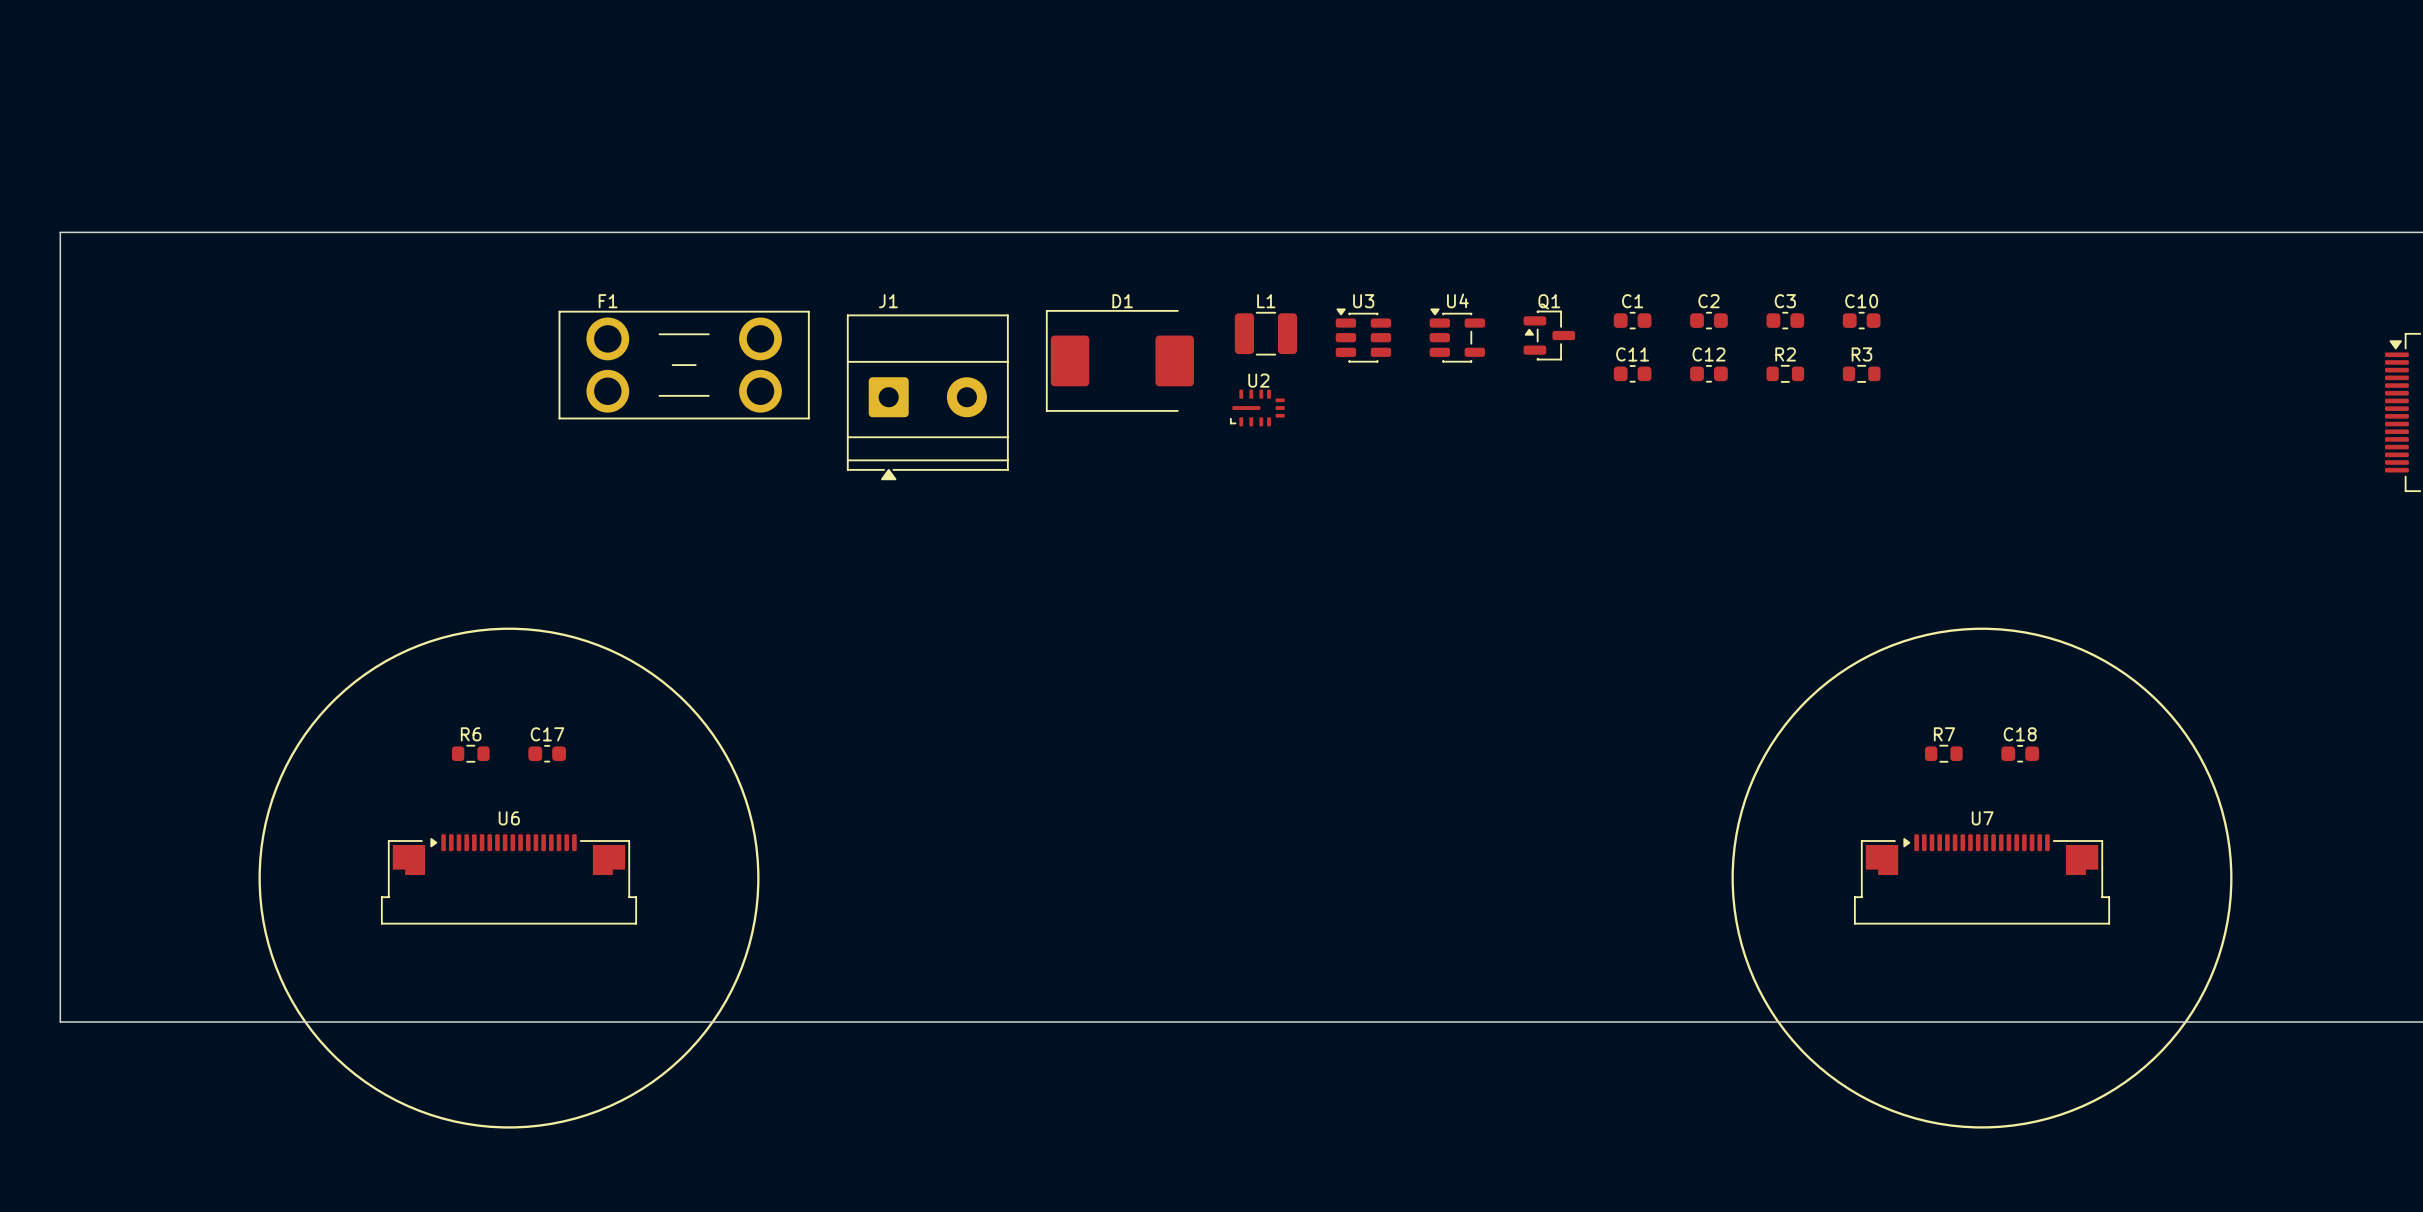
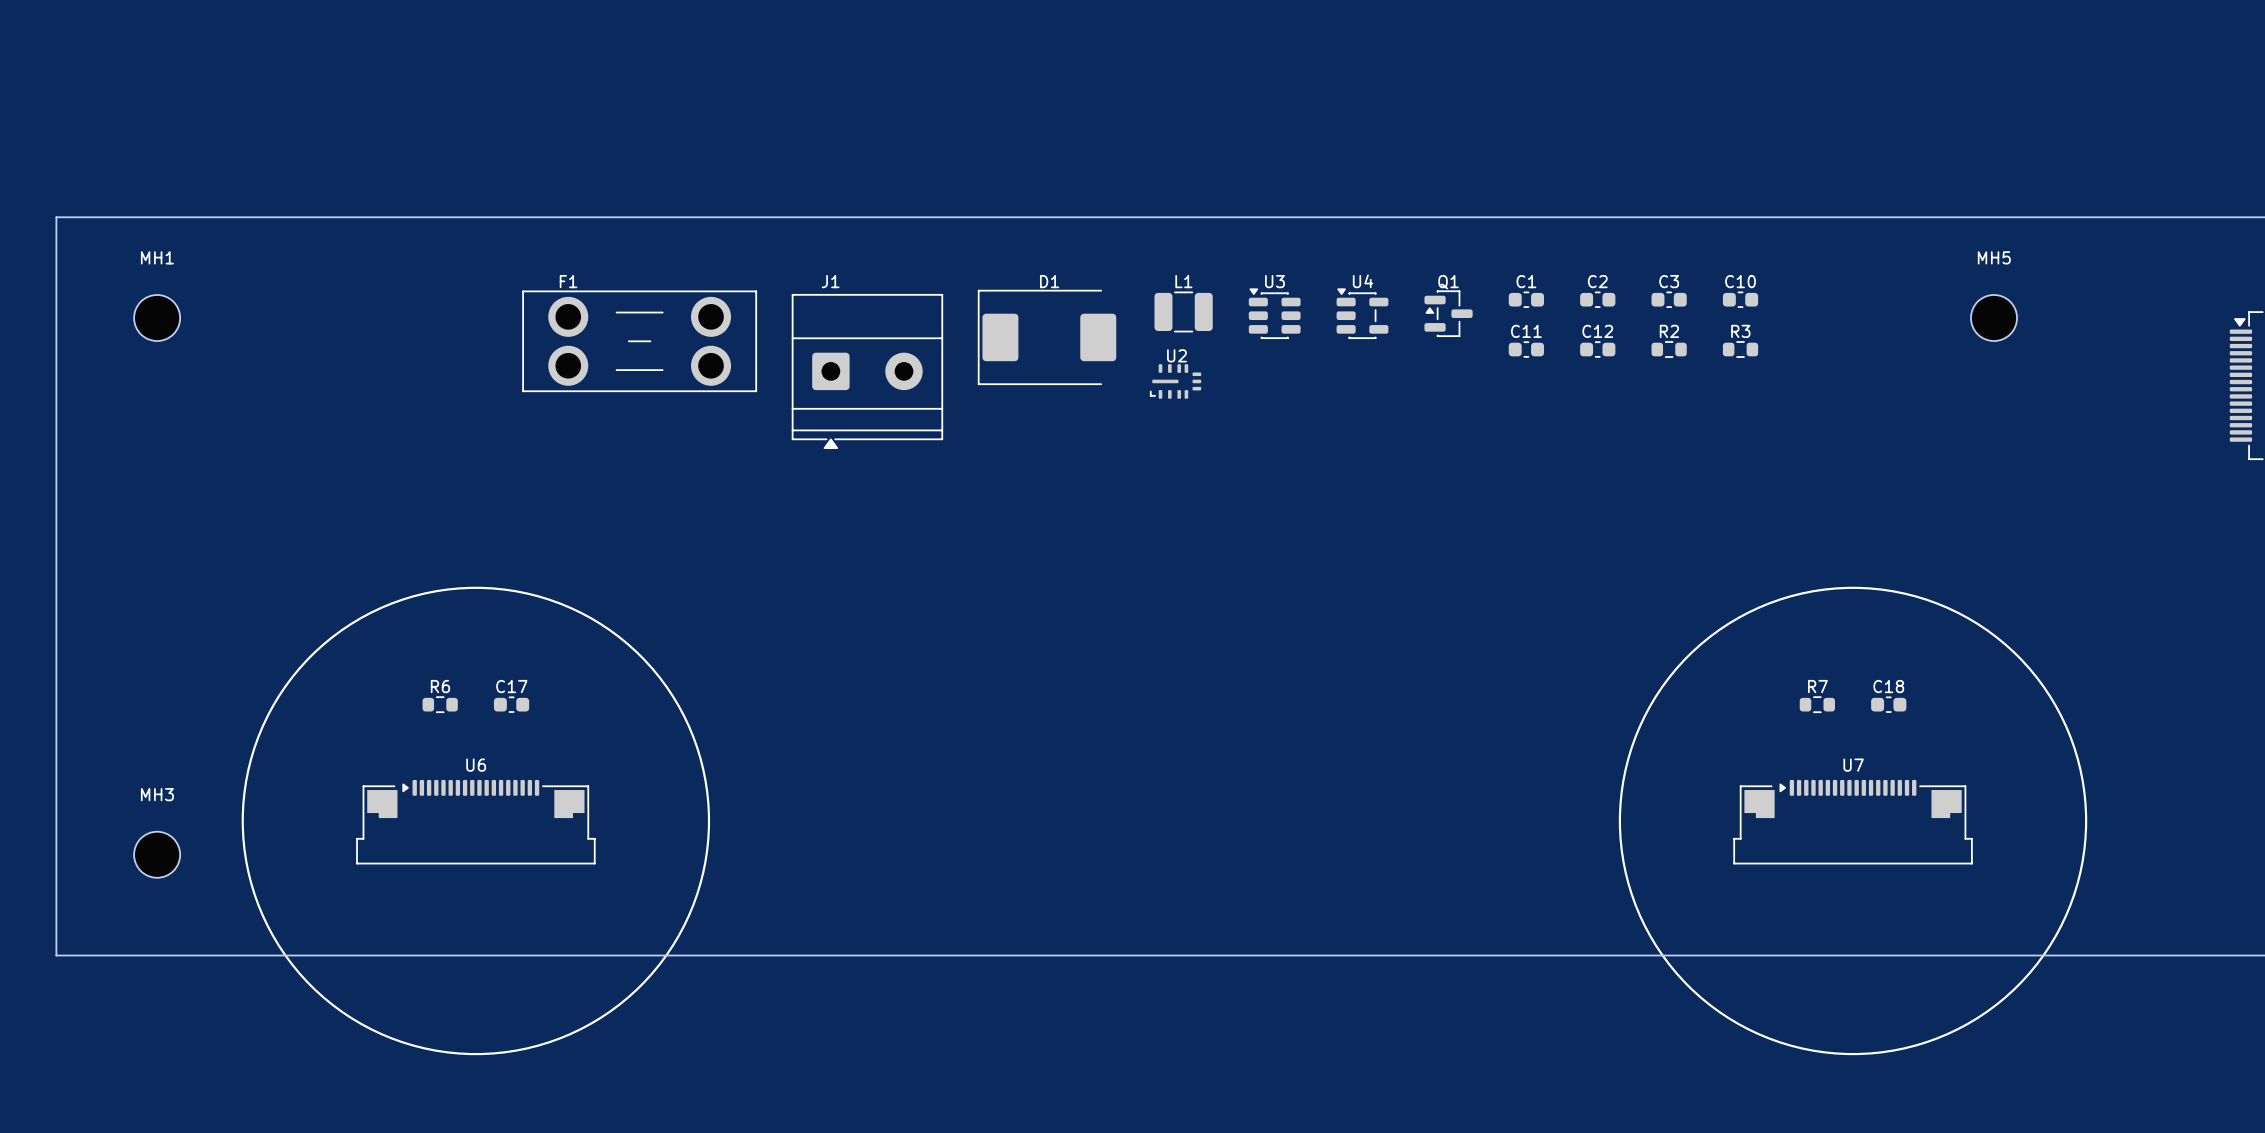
MH1: none -> (157, 318)
MH5: none -> (1994, 318)
MH3: none -> (157, 854)

